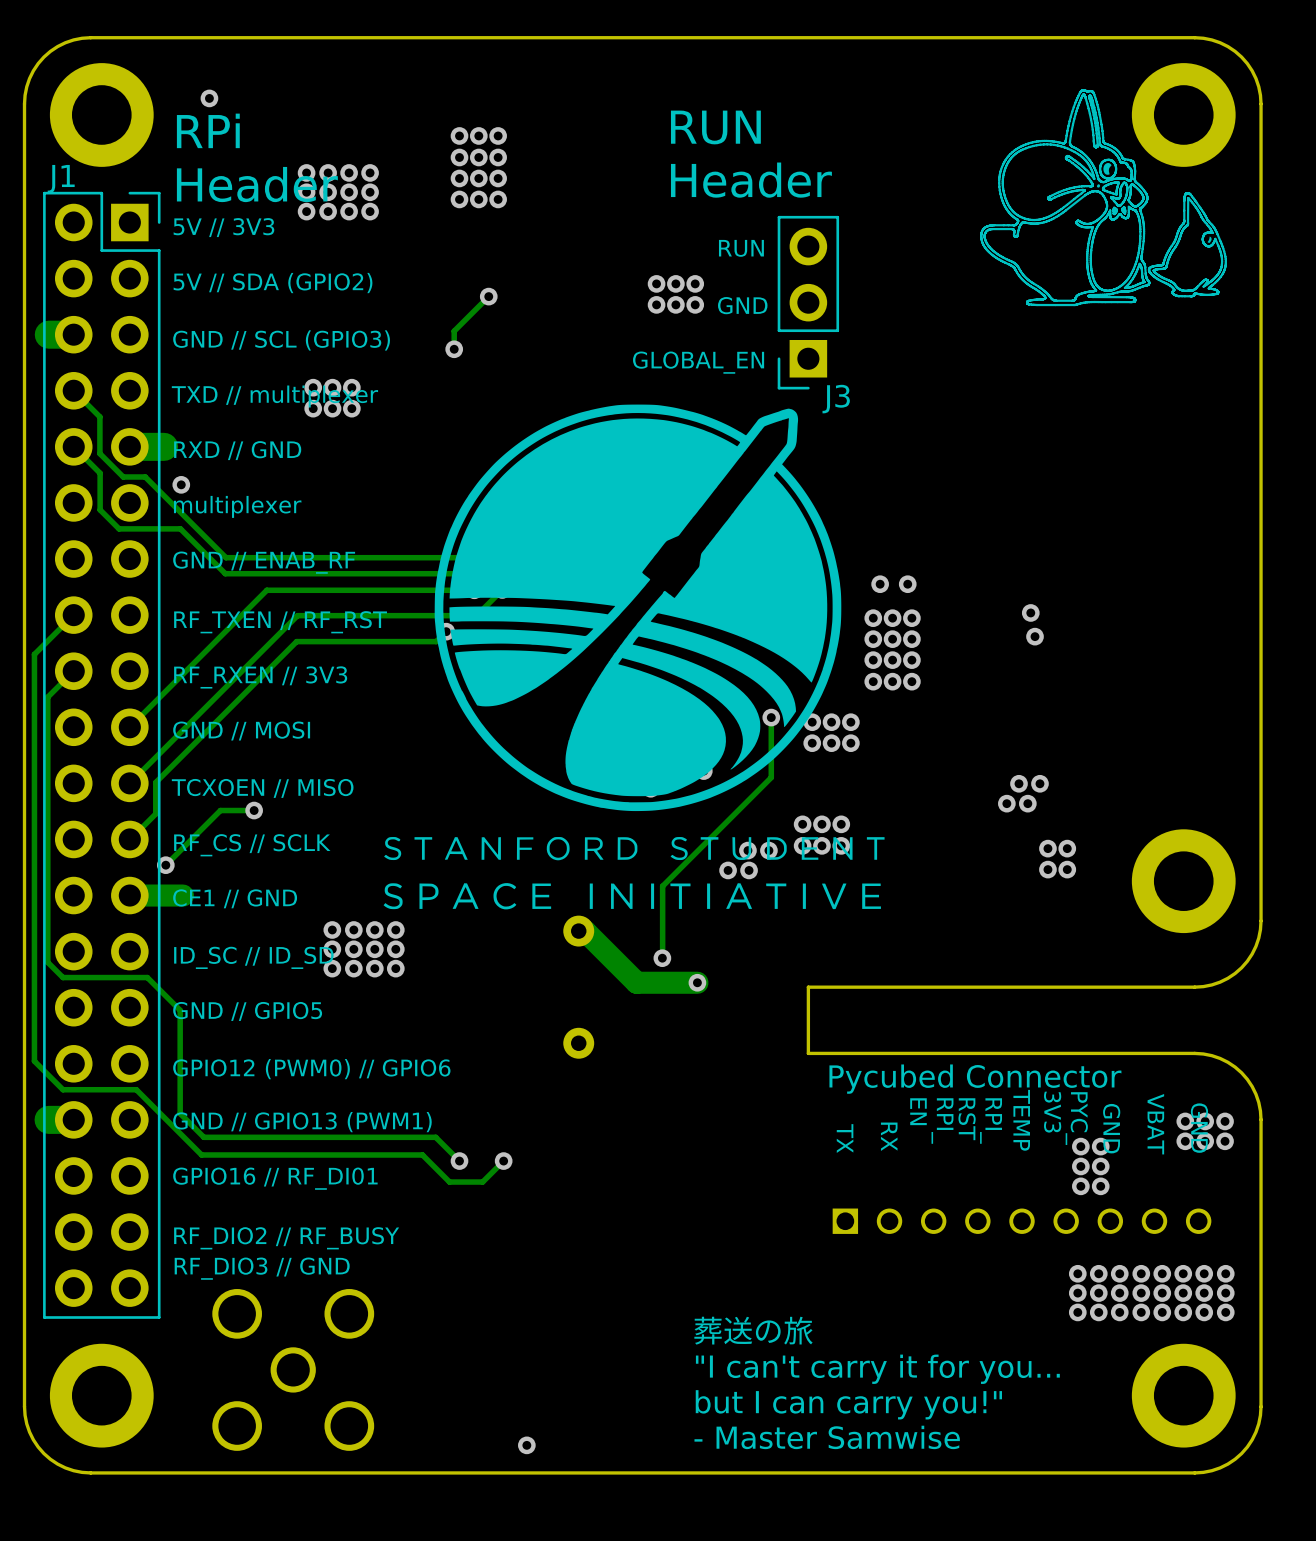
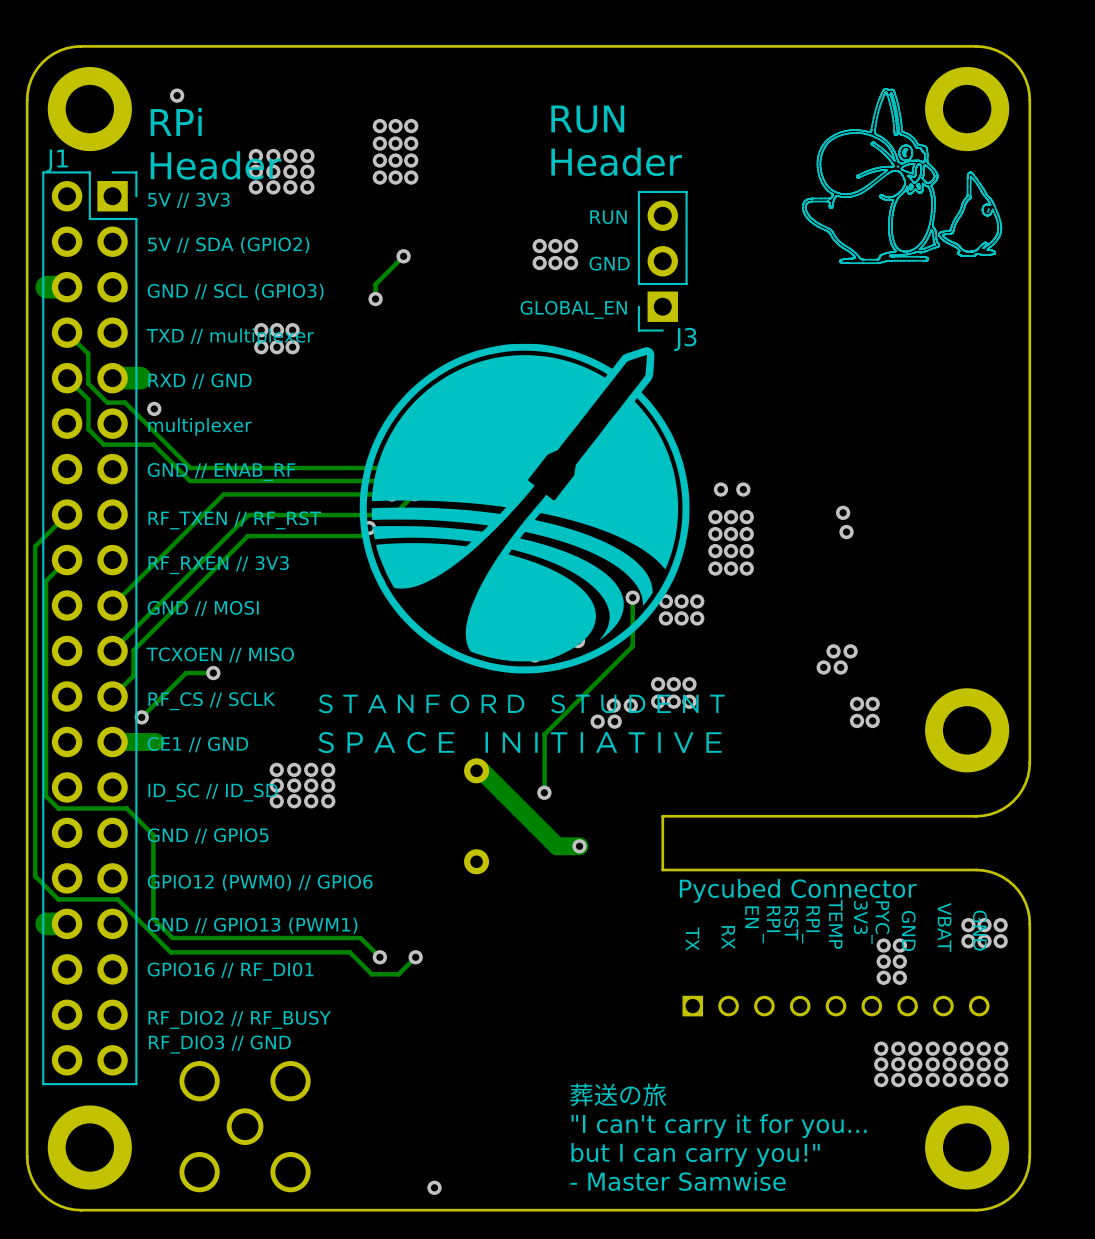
track: (697, 982) (636, 982) -> (579, 846) (557, 846) (523, 812)
via position: (697, 982) -> (579, 846)

